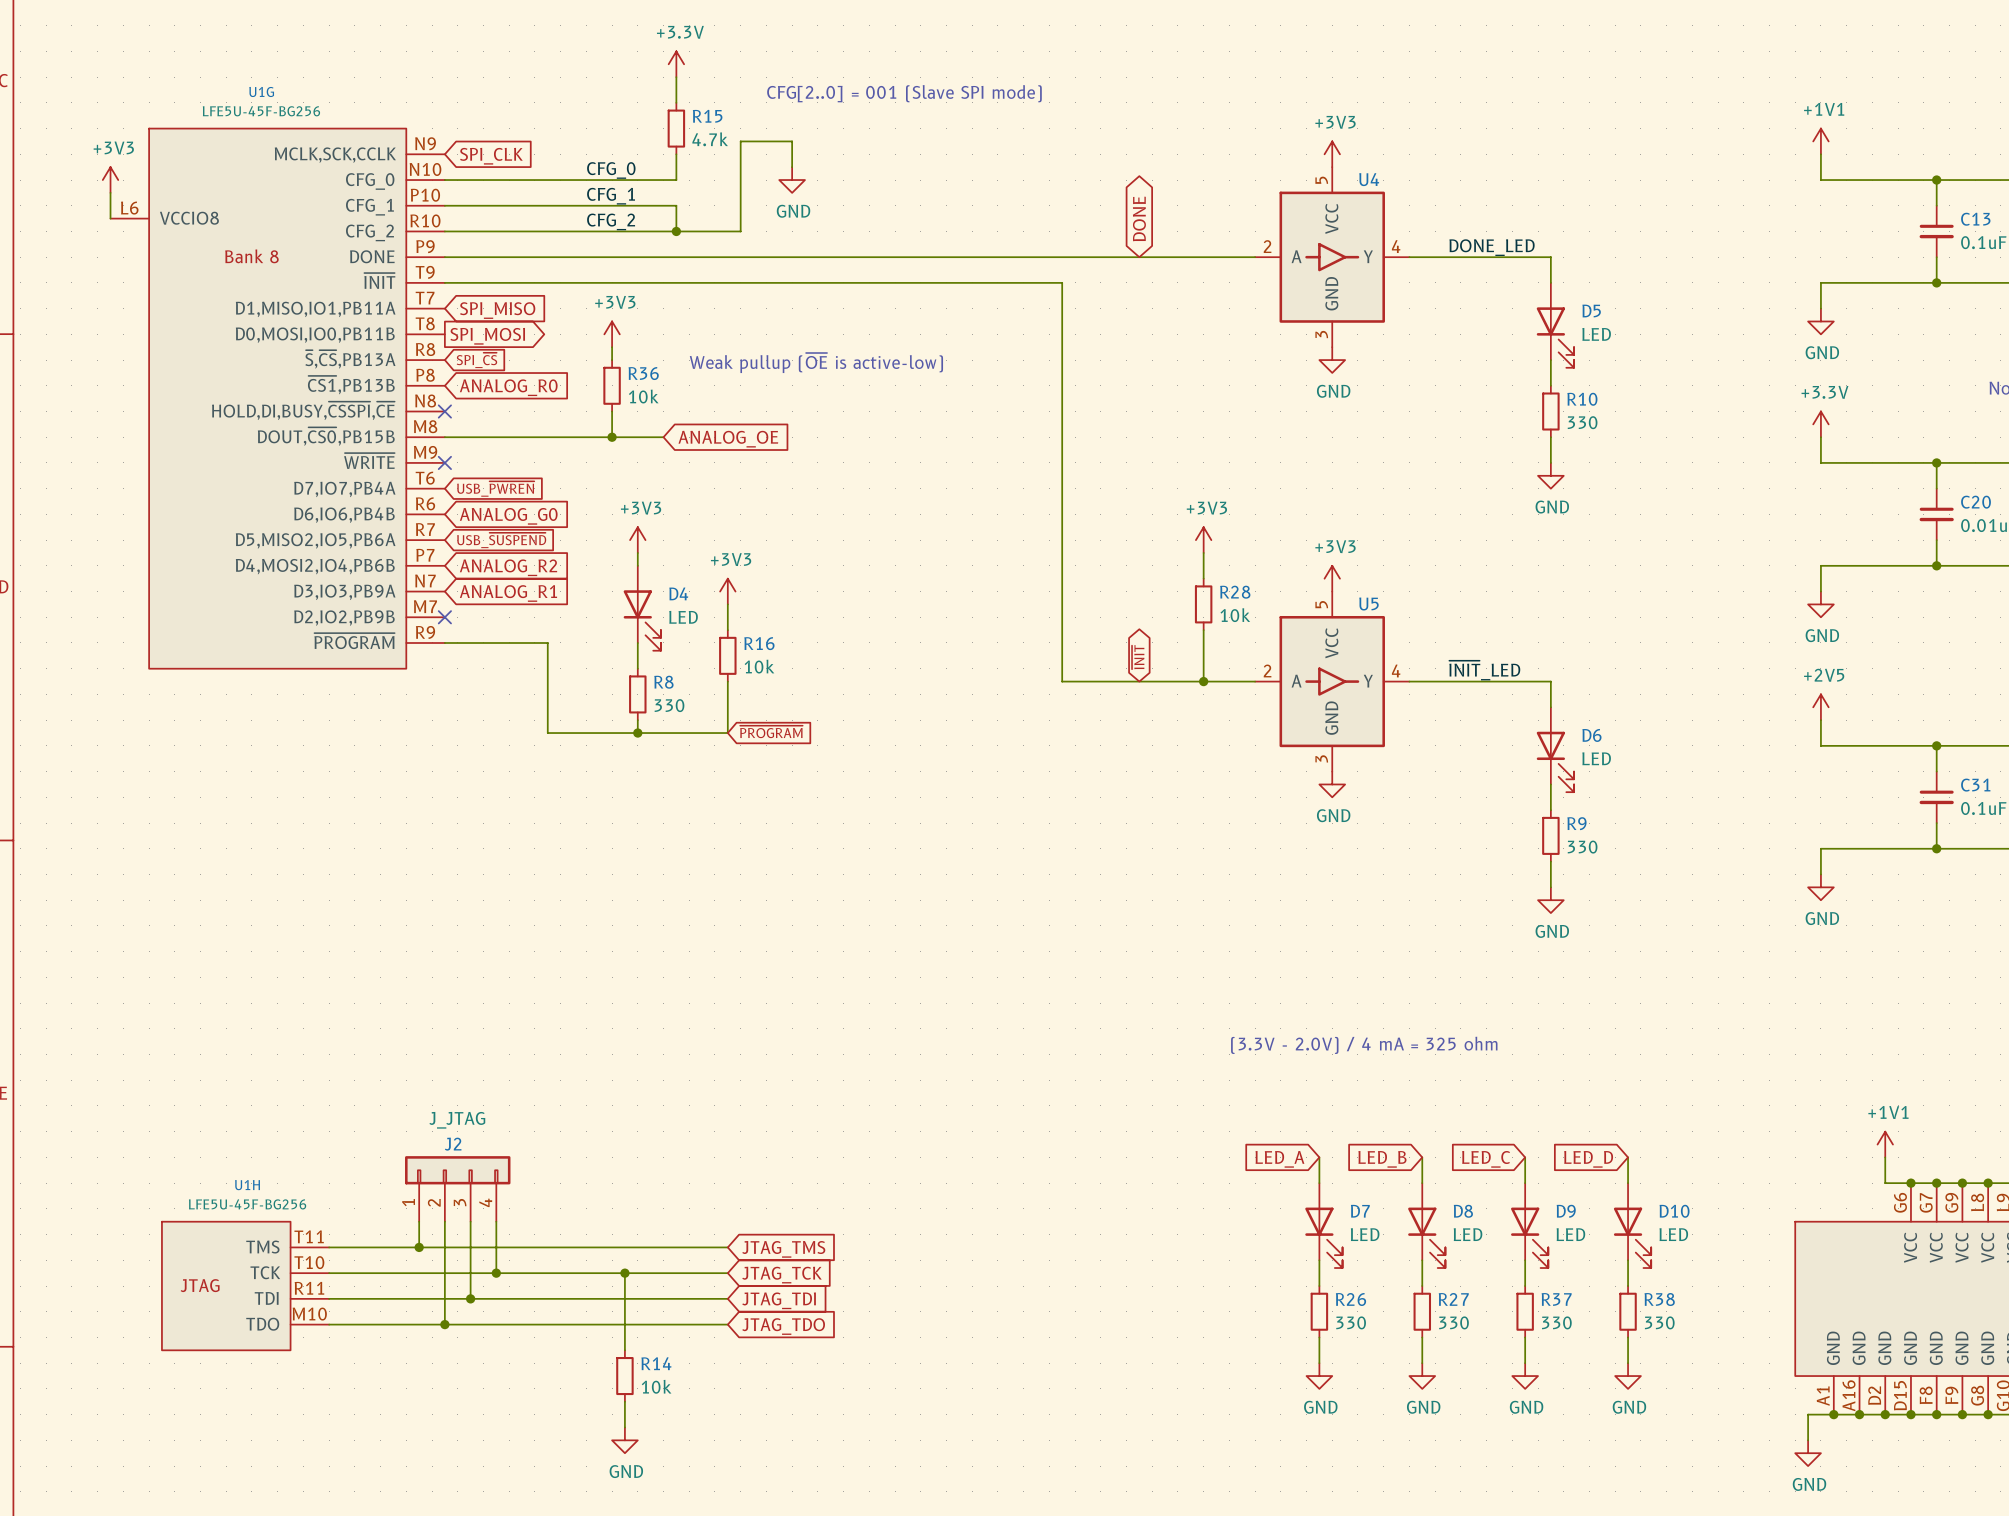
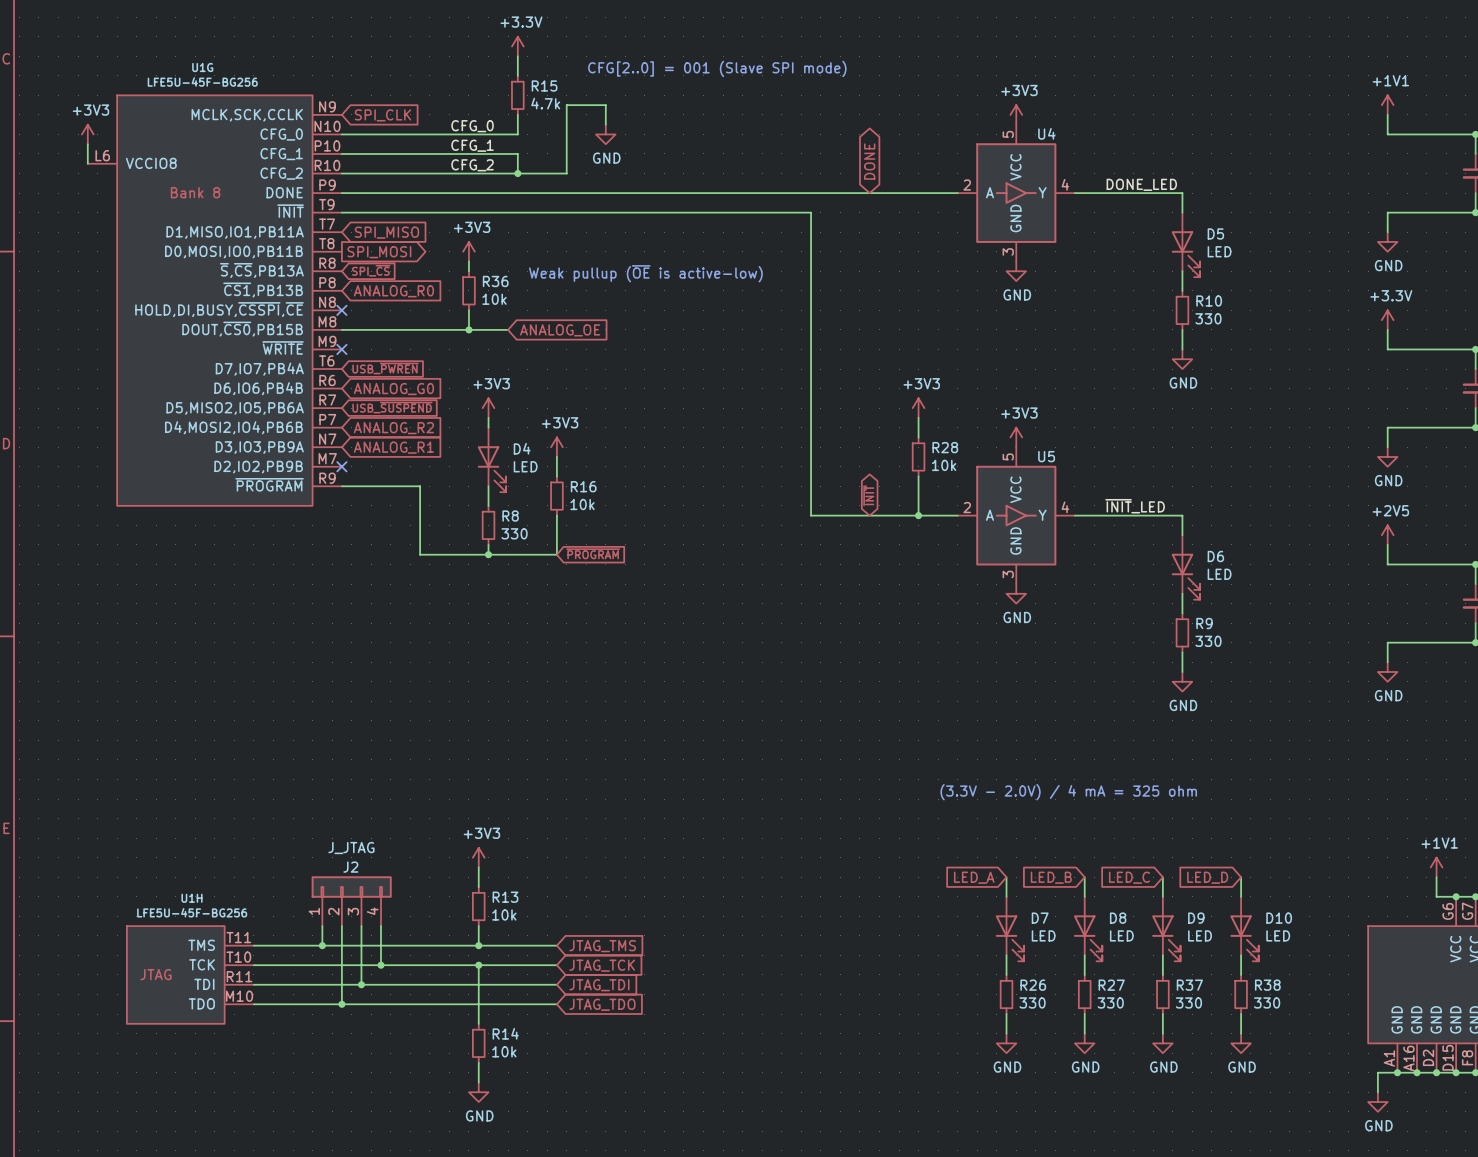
power symbol: none -> +3V3 (478, 857)
wire: none -> (478, 867) (478, 887)
R13: none -> 10k (478, 906)
wire: none -> (478, 926) (478, 945)
junction: none -> (478, 945)

